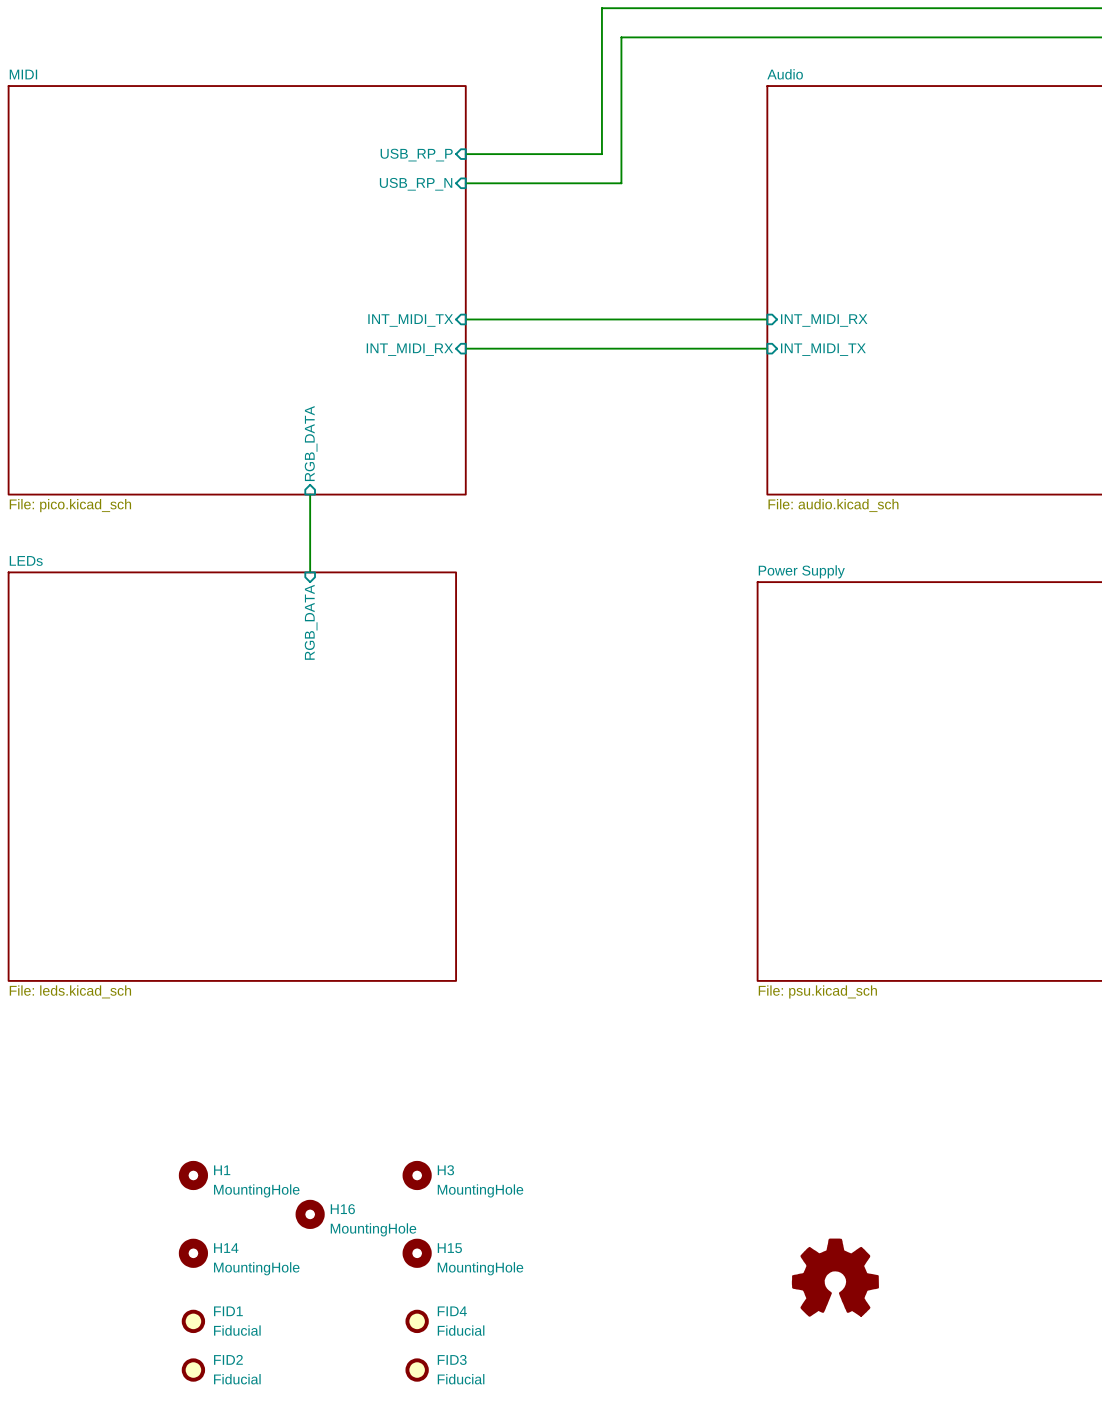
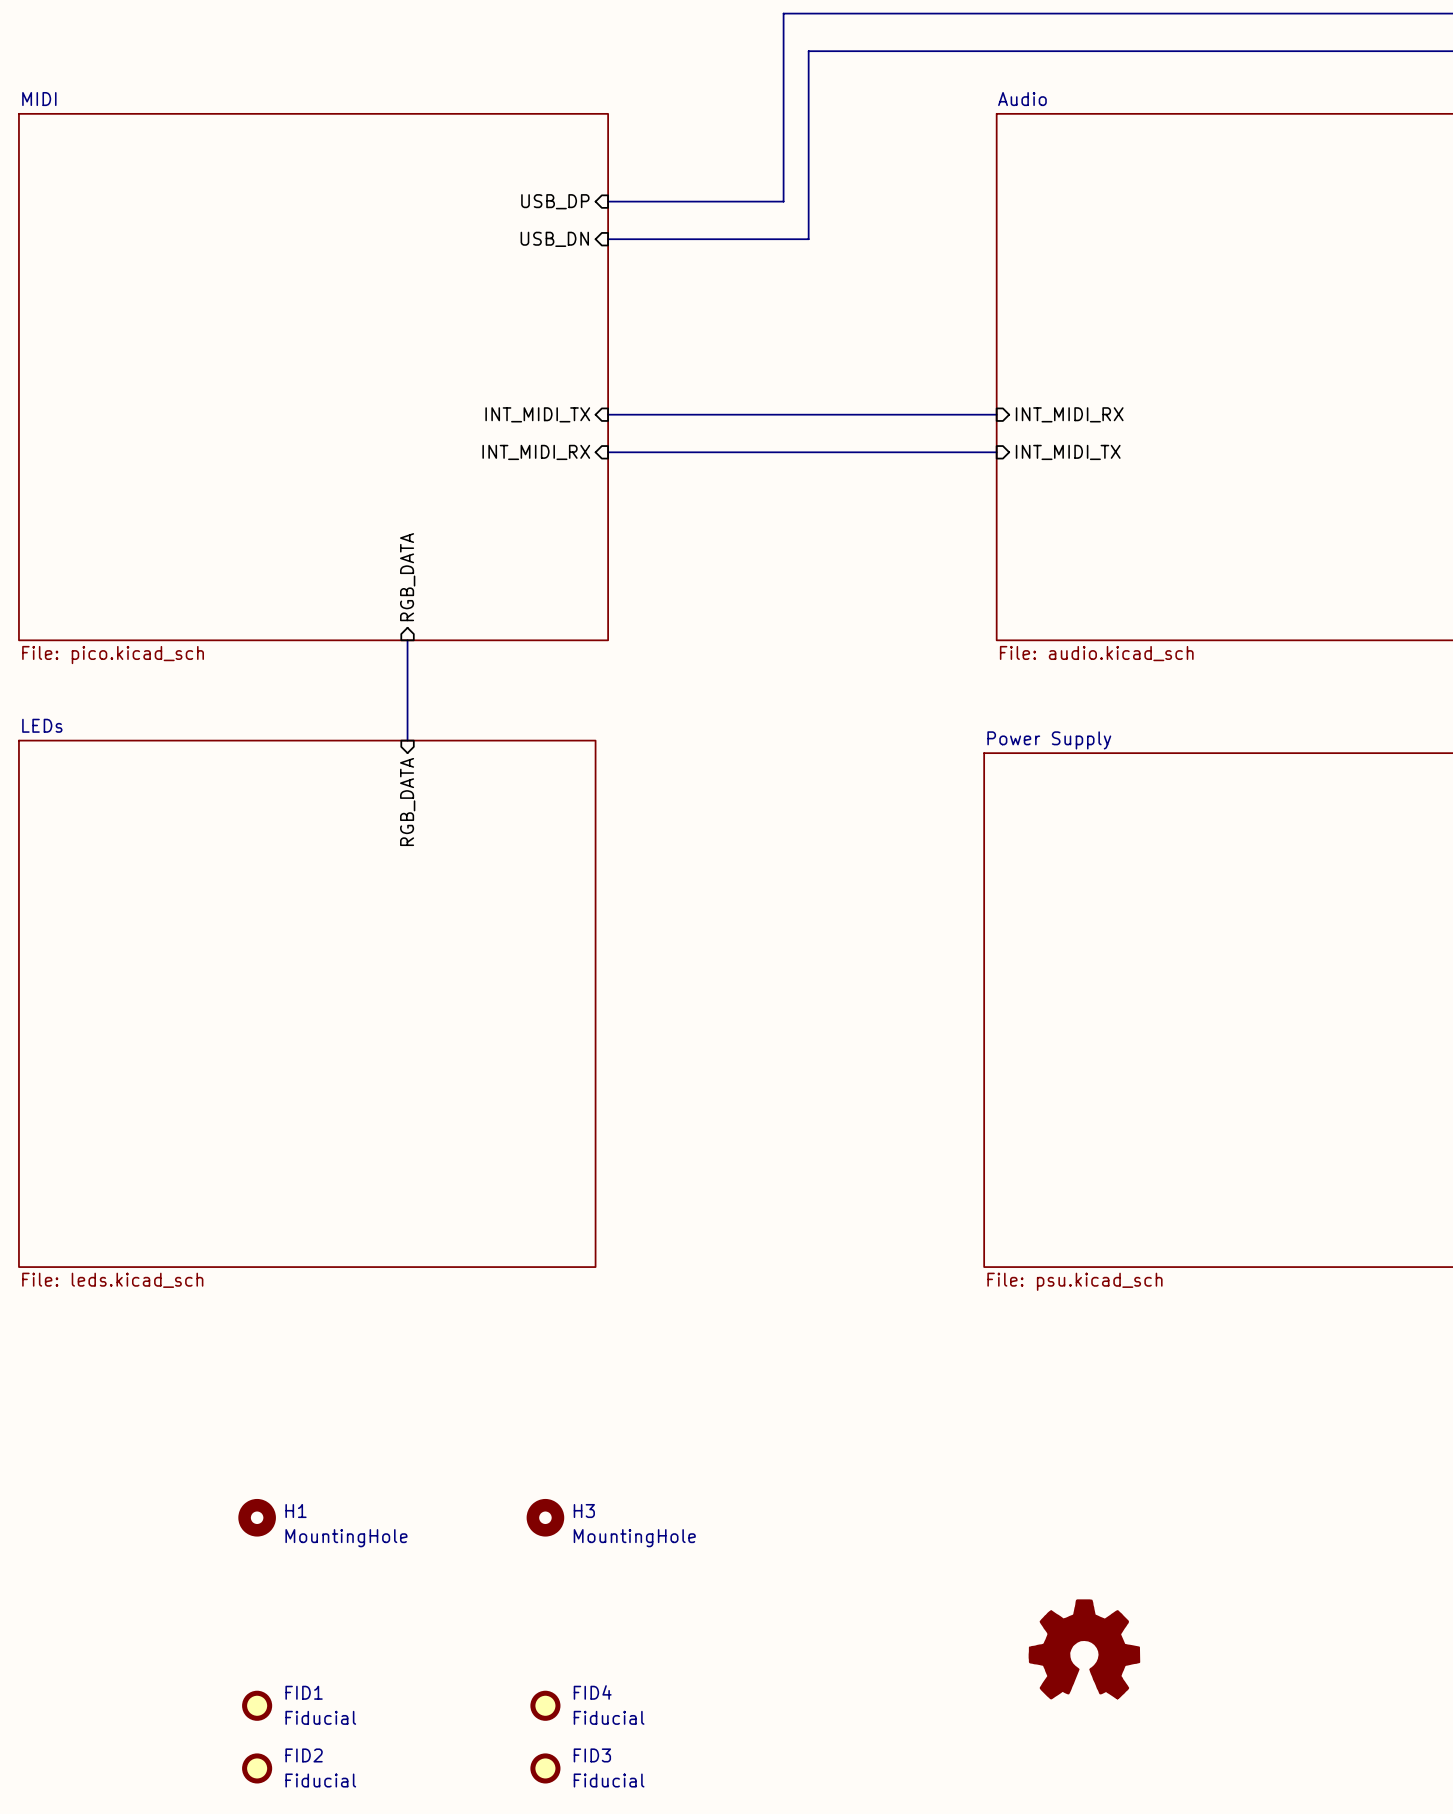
sheet pin: USB_RP_P (416, 155) -> USB_DP (555, 201)
sheet pin: USB_RP_N (416, 184) -> USB_DN (554, 239)
H16: MountingHole (310, 1214) -> none
H14: MountingHole (193, 1253) -> none
H15: MountingHole (417, 1253) -> none

